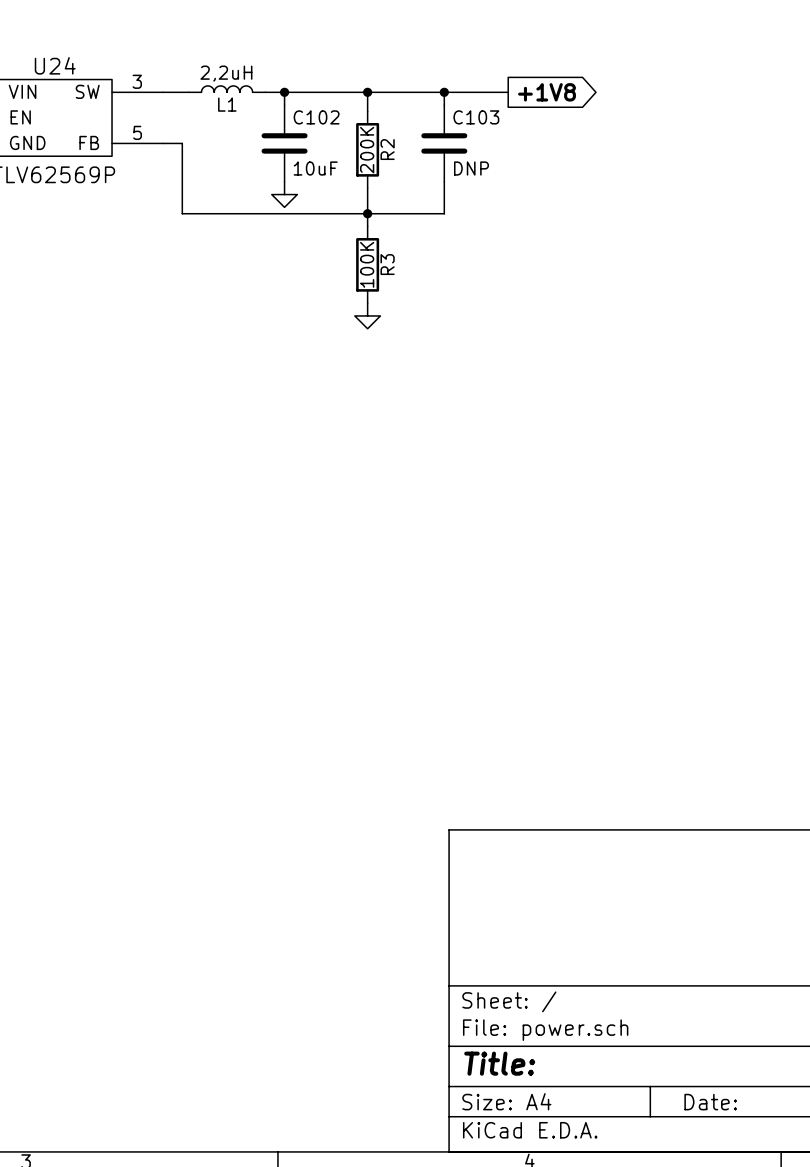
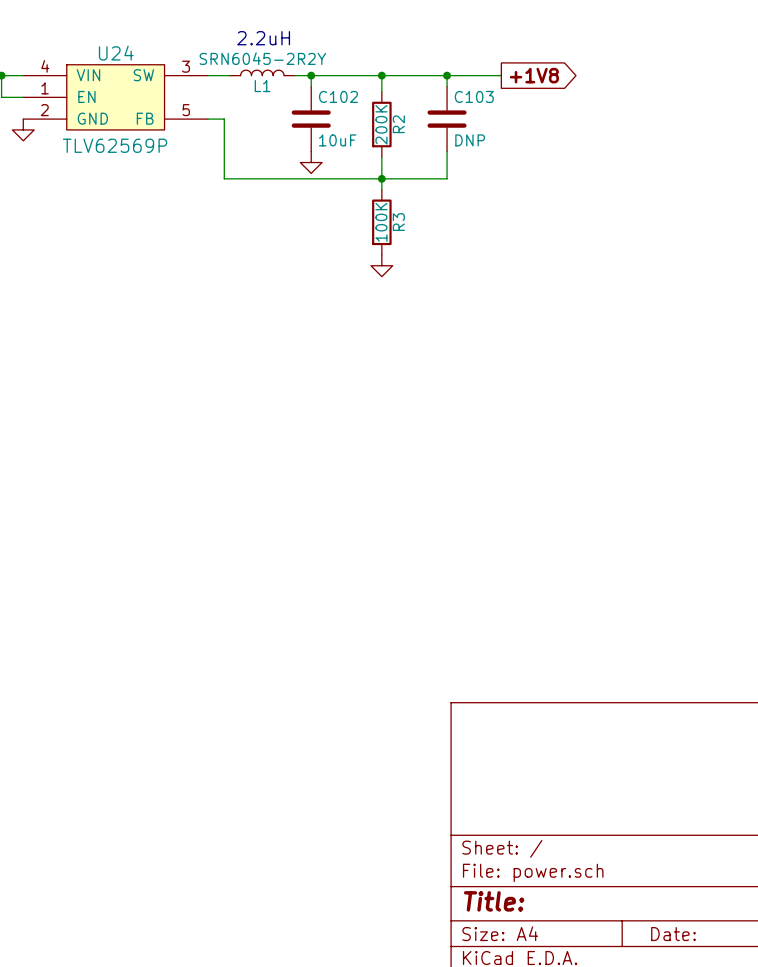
text: none -> 2.2uH (263, 38)
L1 value: 2,2uH (226, 73) -> SRN6045-2R2Y (262, 58)

